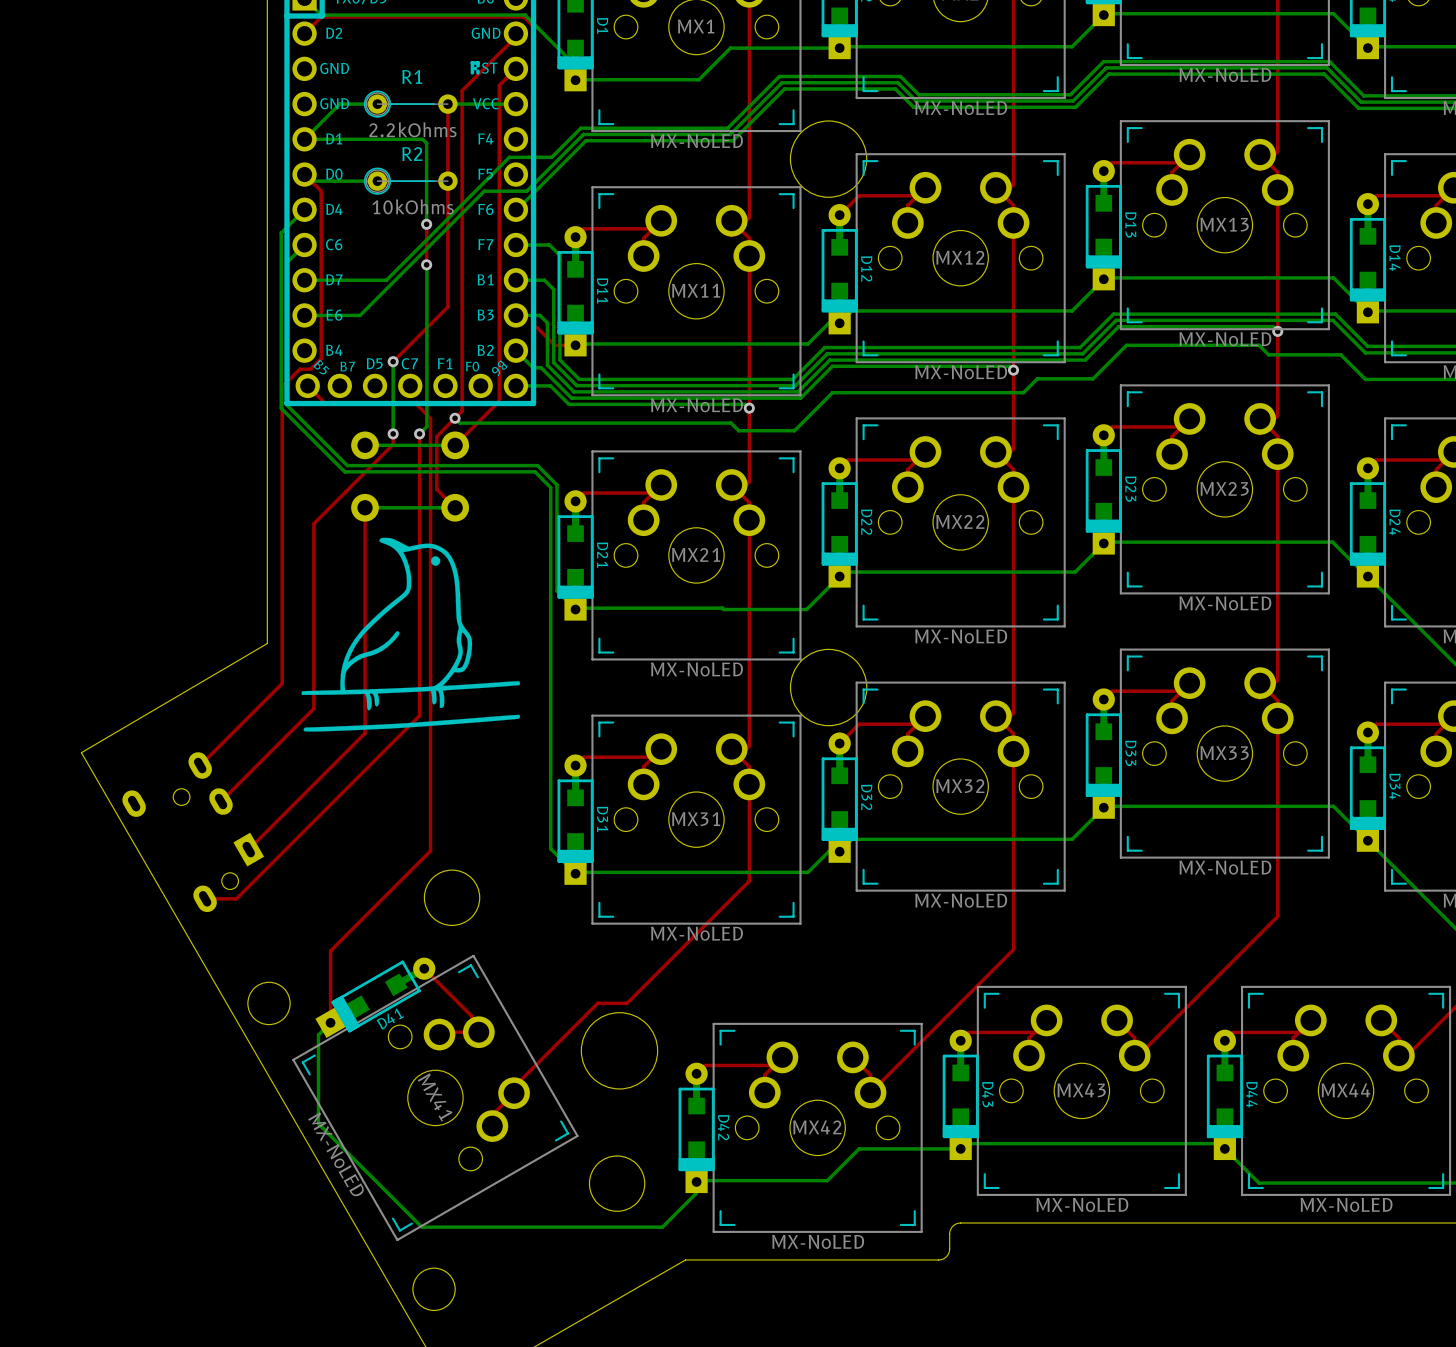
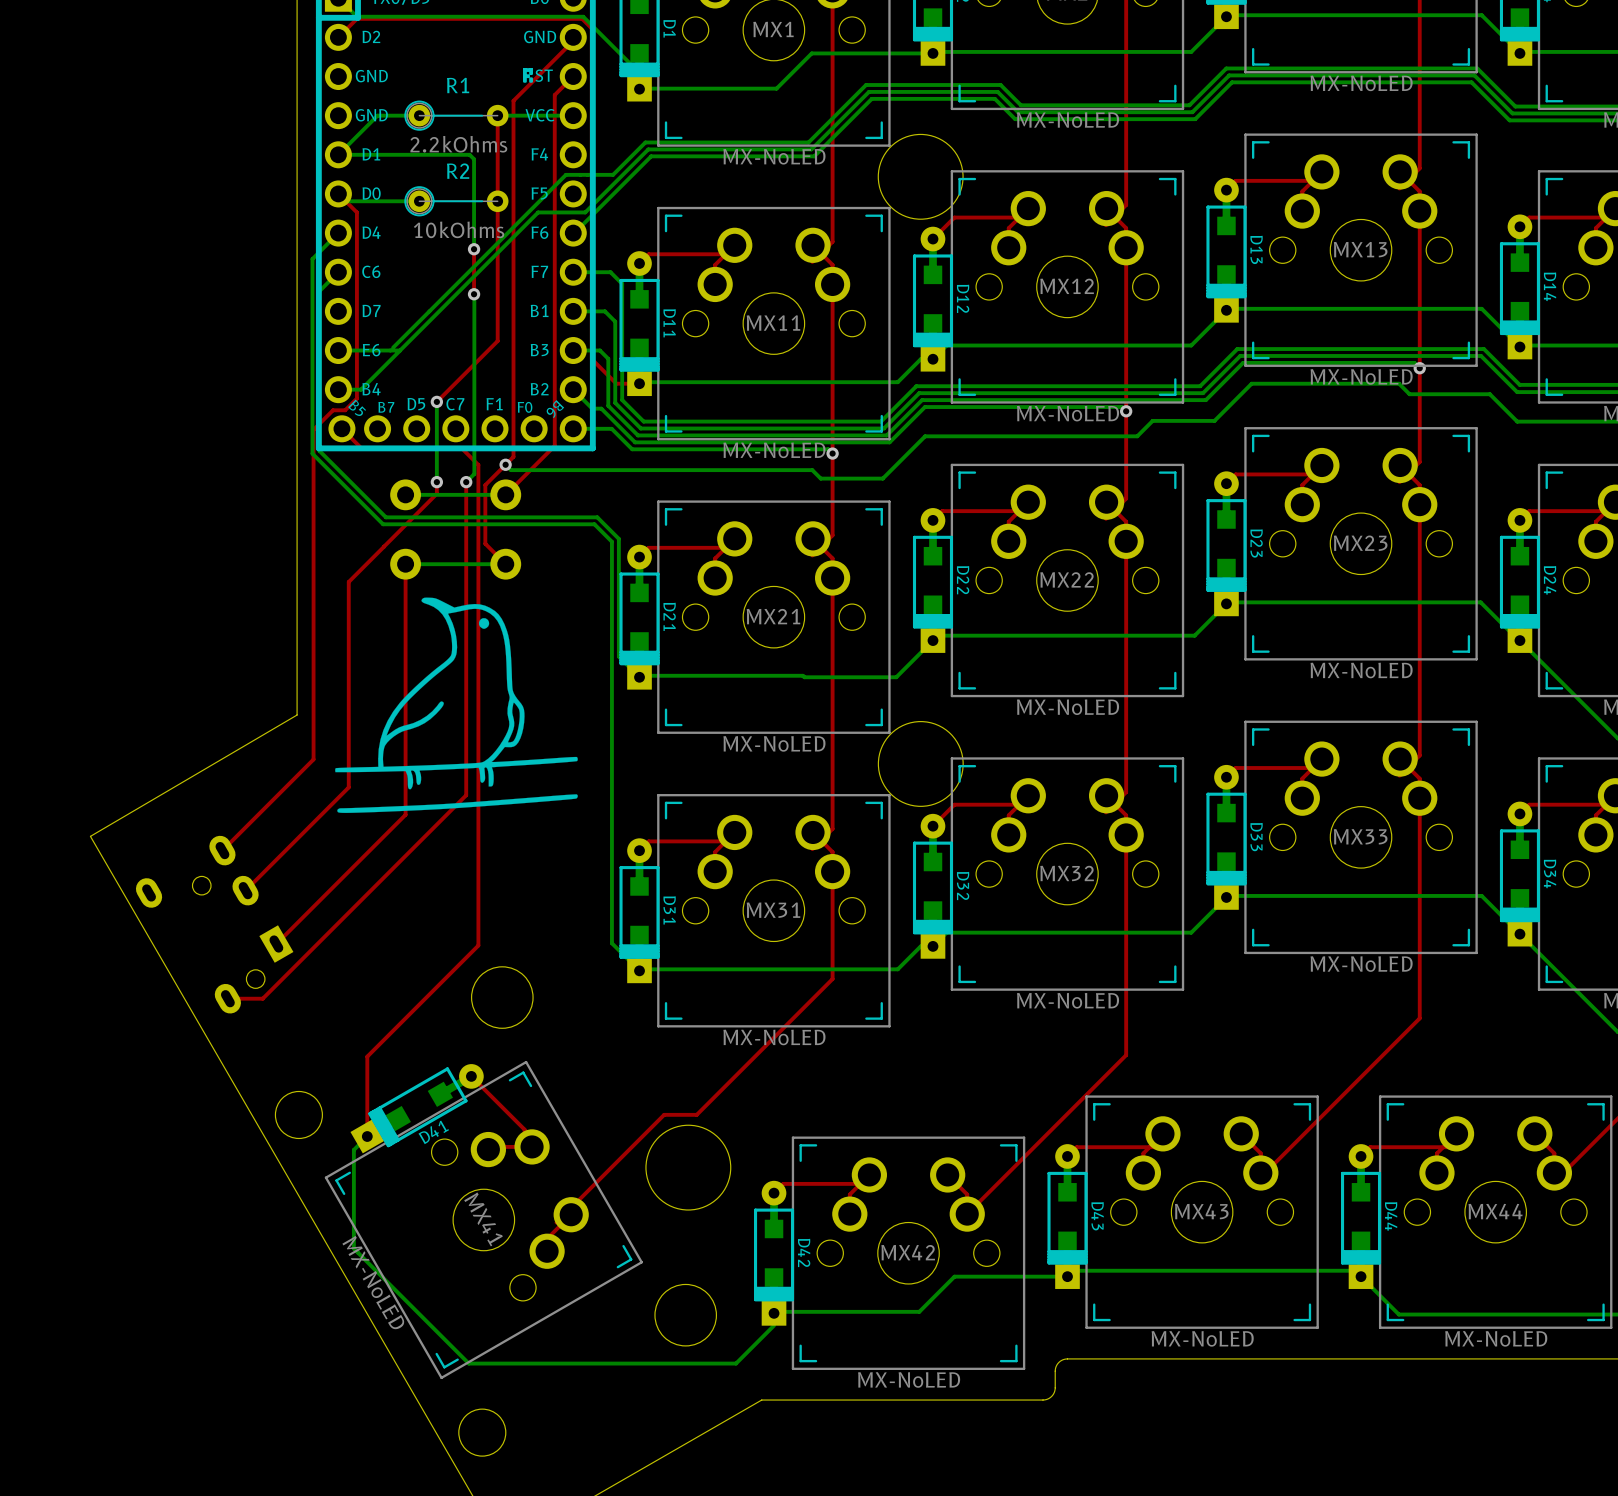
bottom track: (386, 280) (304, 280) -> (429, 311) (393, 347)
bottom track: none -> (400, 350) (361, 389) (338, 389)

